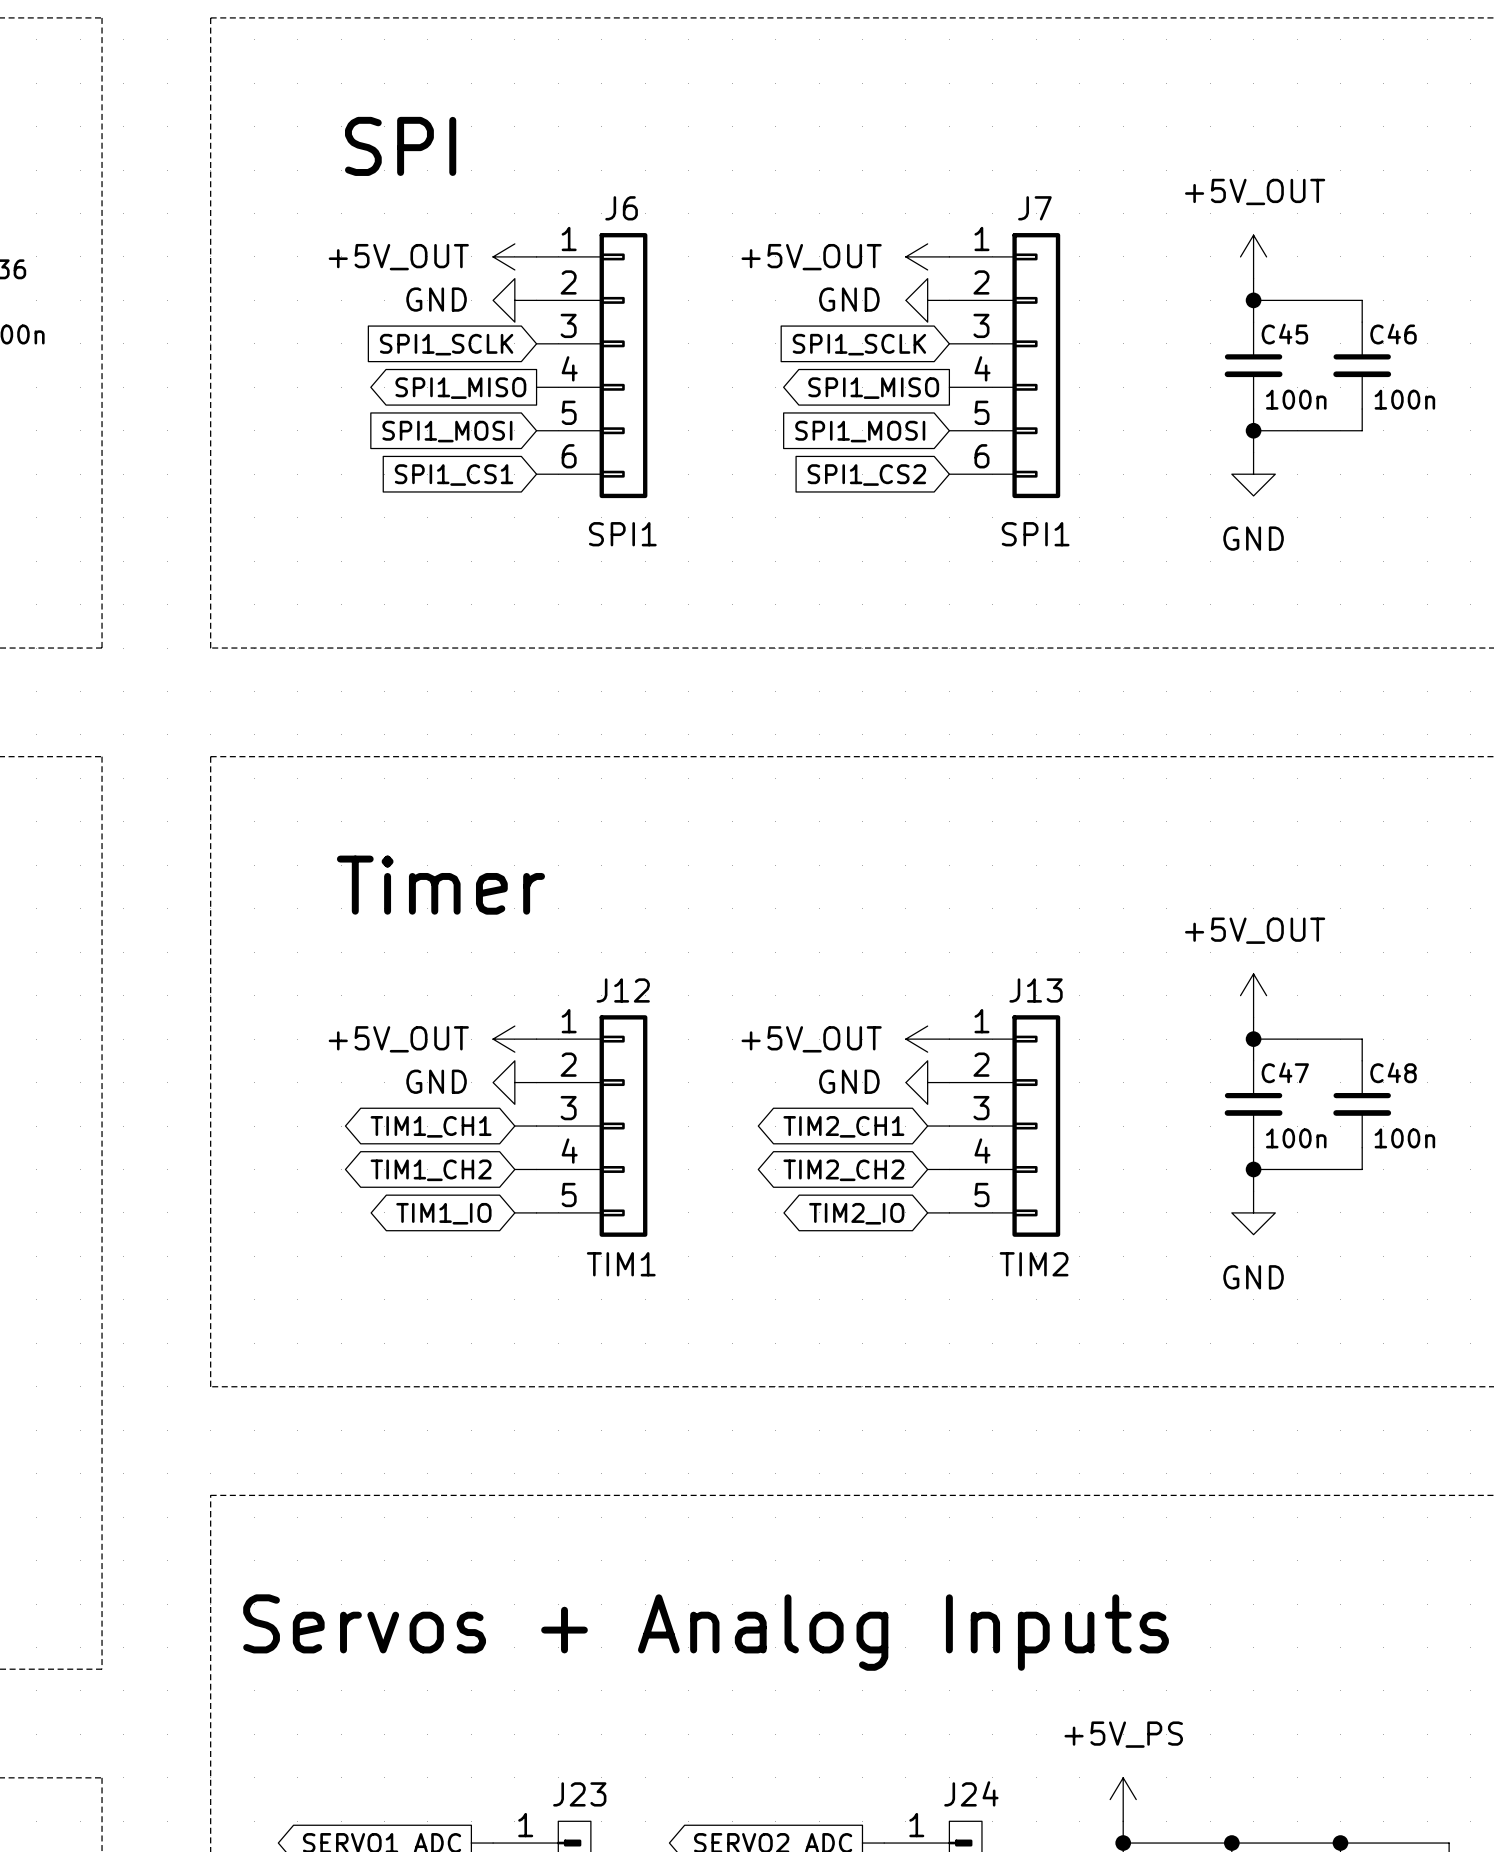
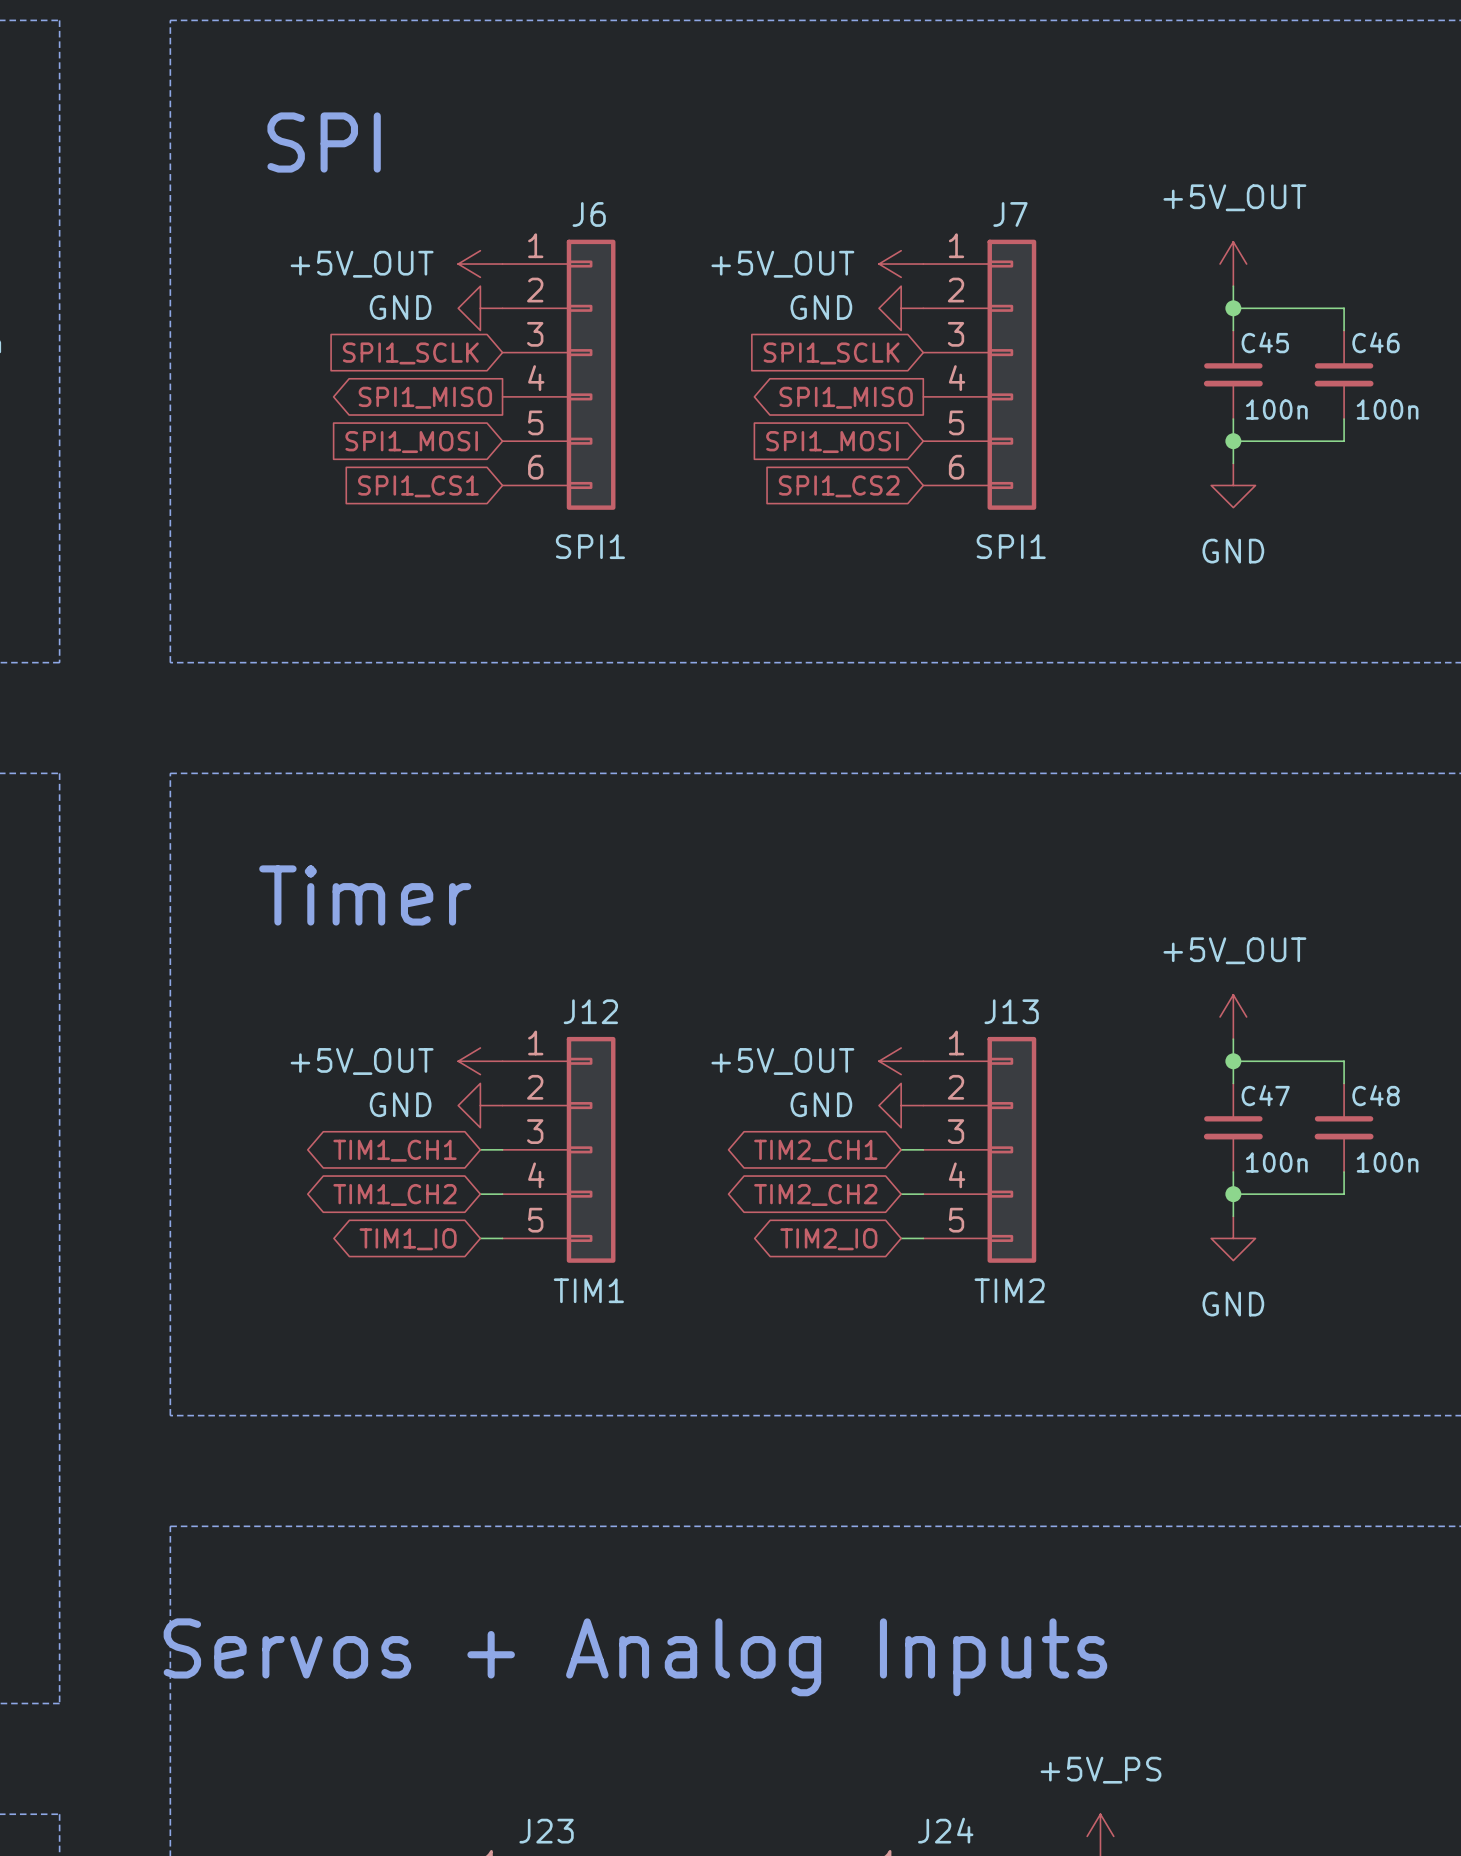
text position: SPI (400, 146) -> SPI (324, 142)
text position: Timer (440, 885) -> Timer (365, 895)
text position: Servos + Analog Inputs (706, 1632) -> Servos + Analog Inputs (635, 1657)

